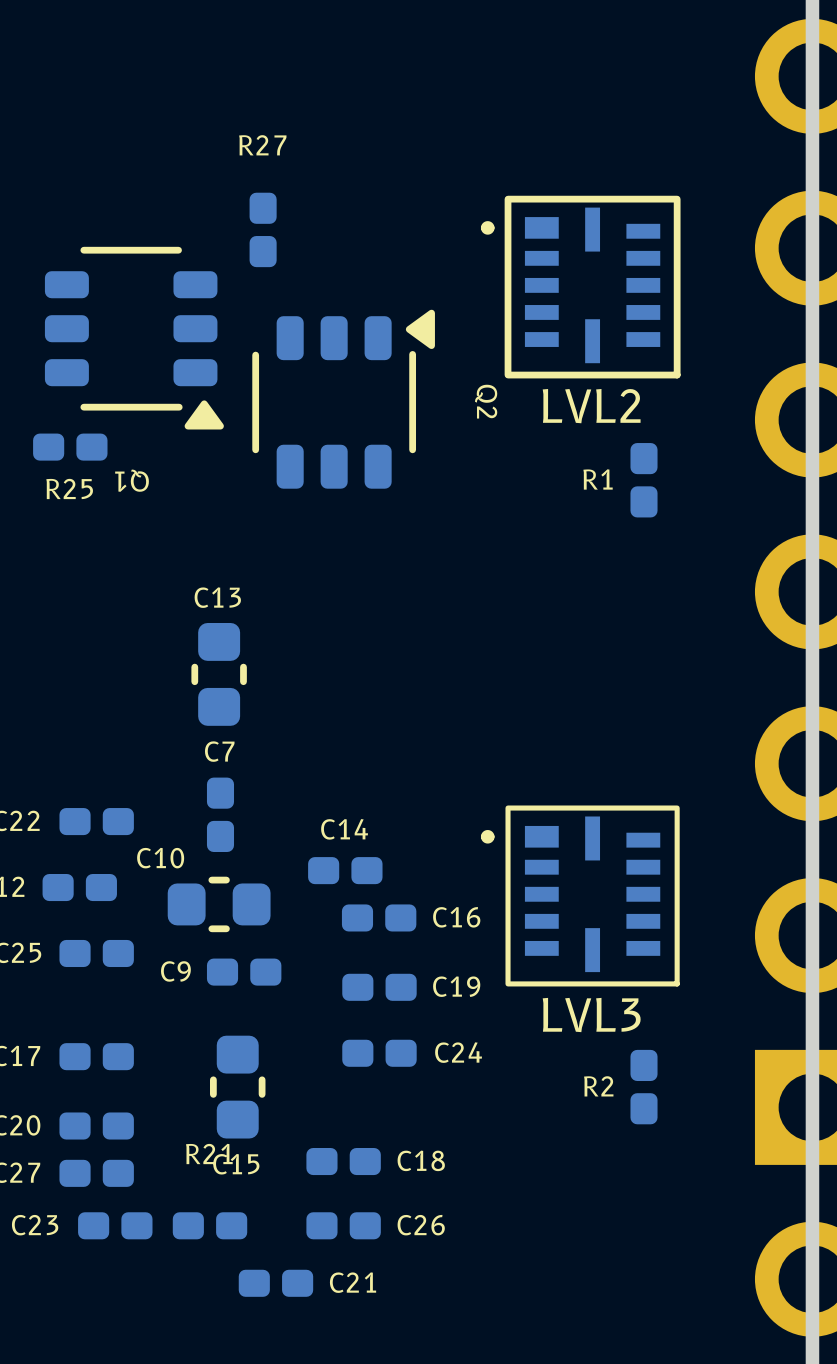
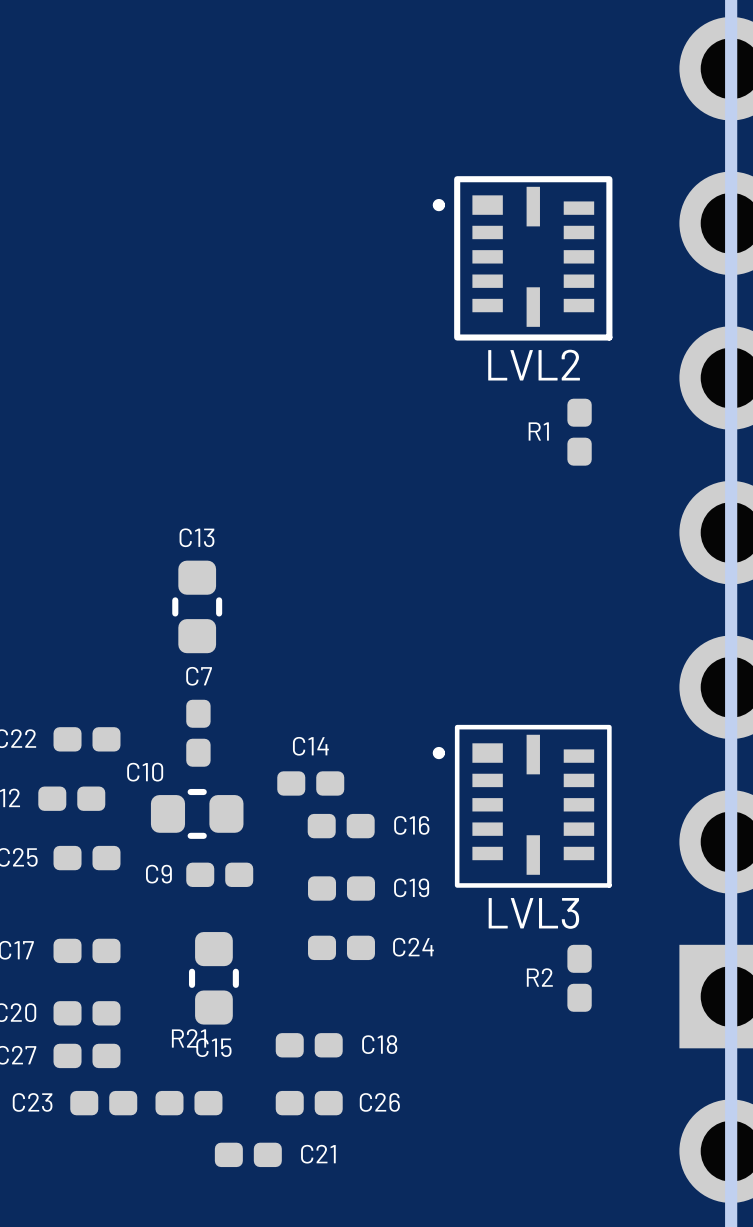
R27: (263, 229) -> none
Q1: (134, 338) -> none
Q2: (343, 399) -> none
R25: (70, 447) -> none

